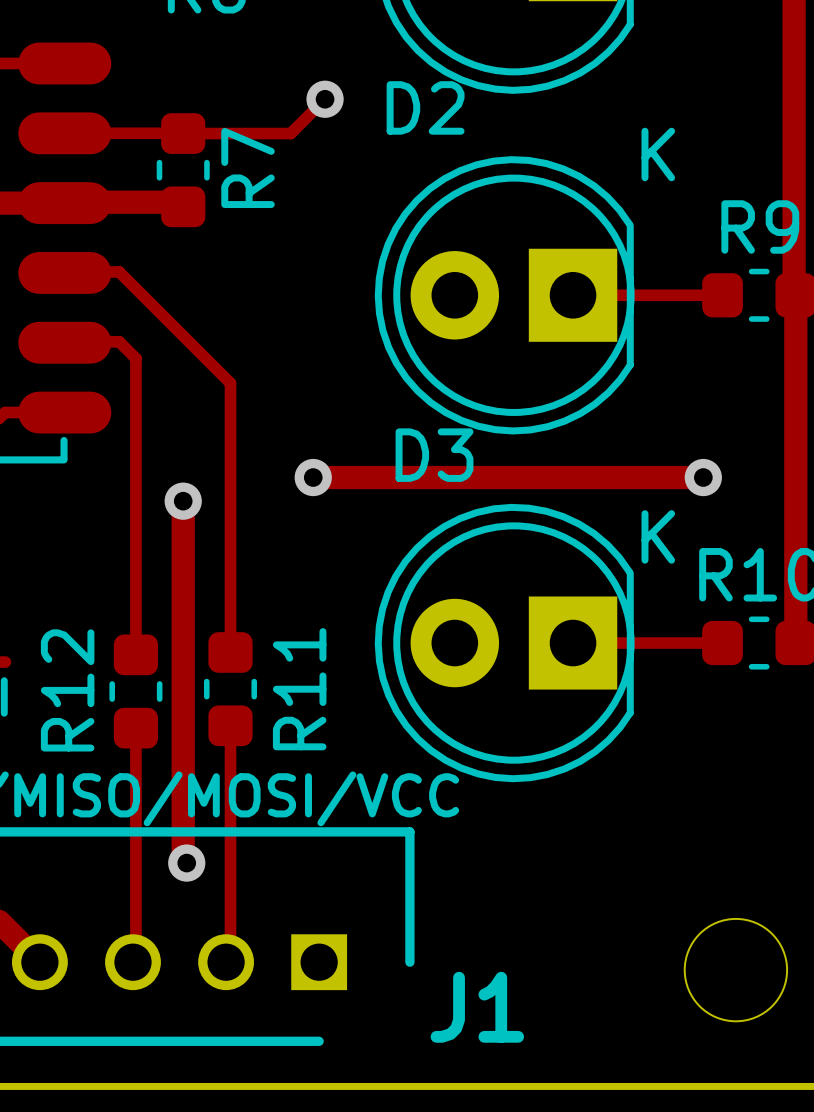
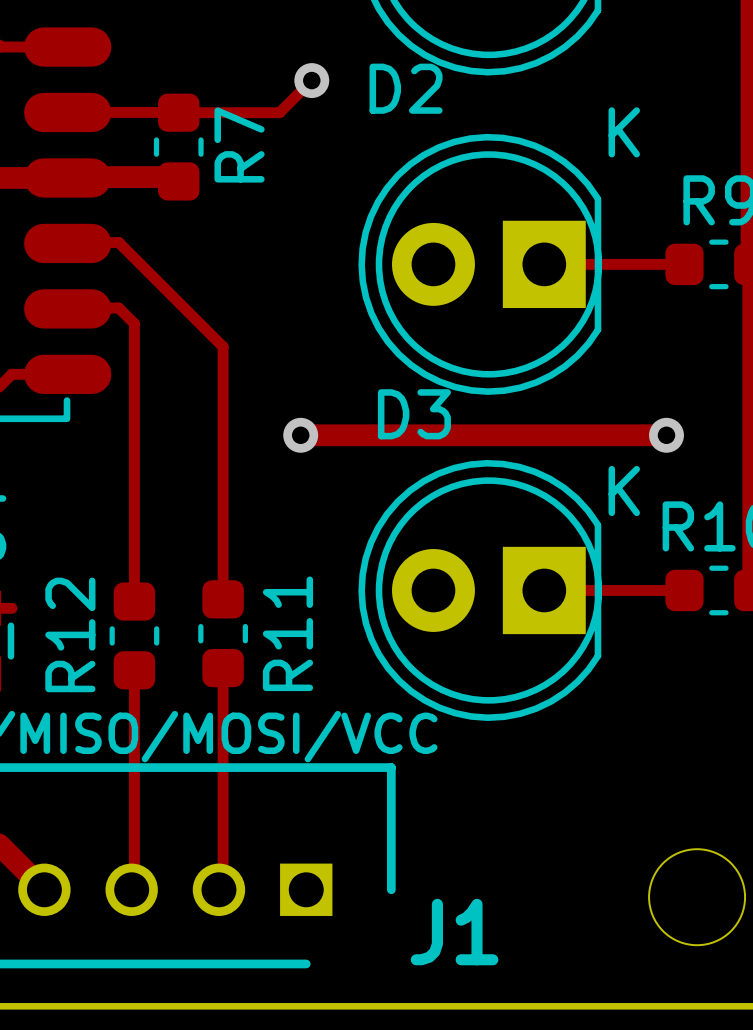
track: (183, 501) (183, 859) (186, 863) -> none
via: (183, 501) -> none
via: (186, 863) -> none

